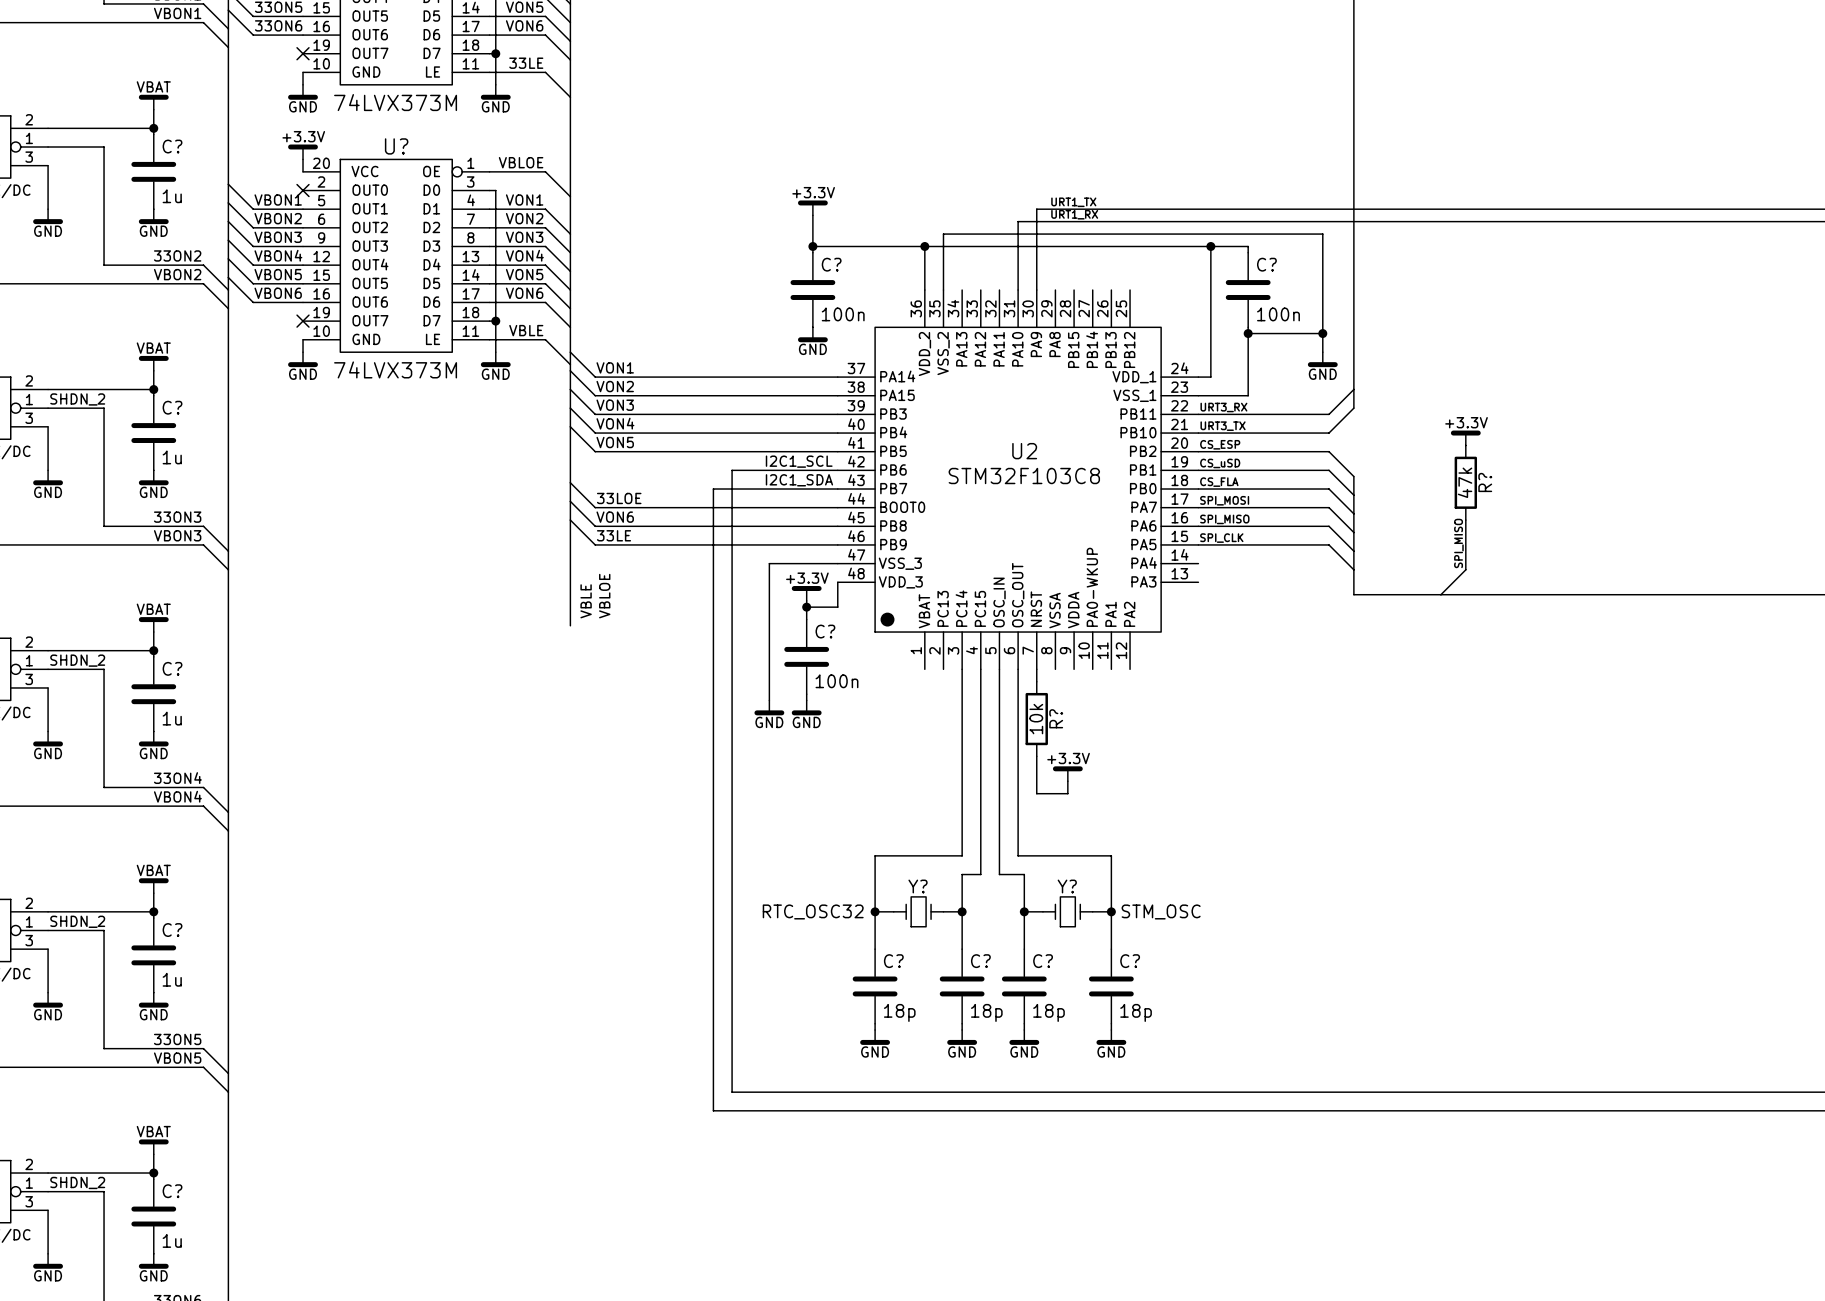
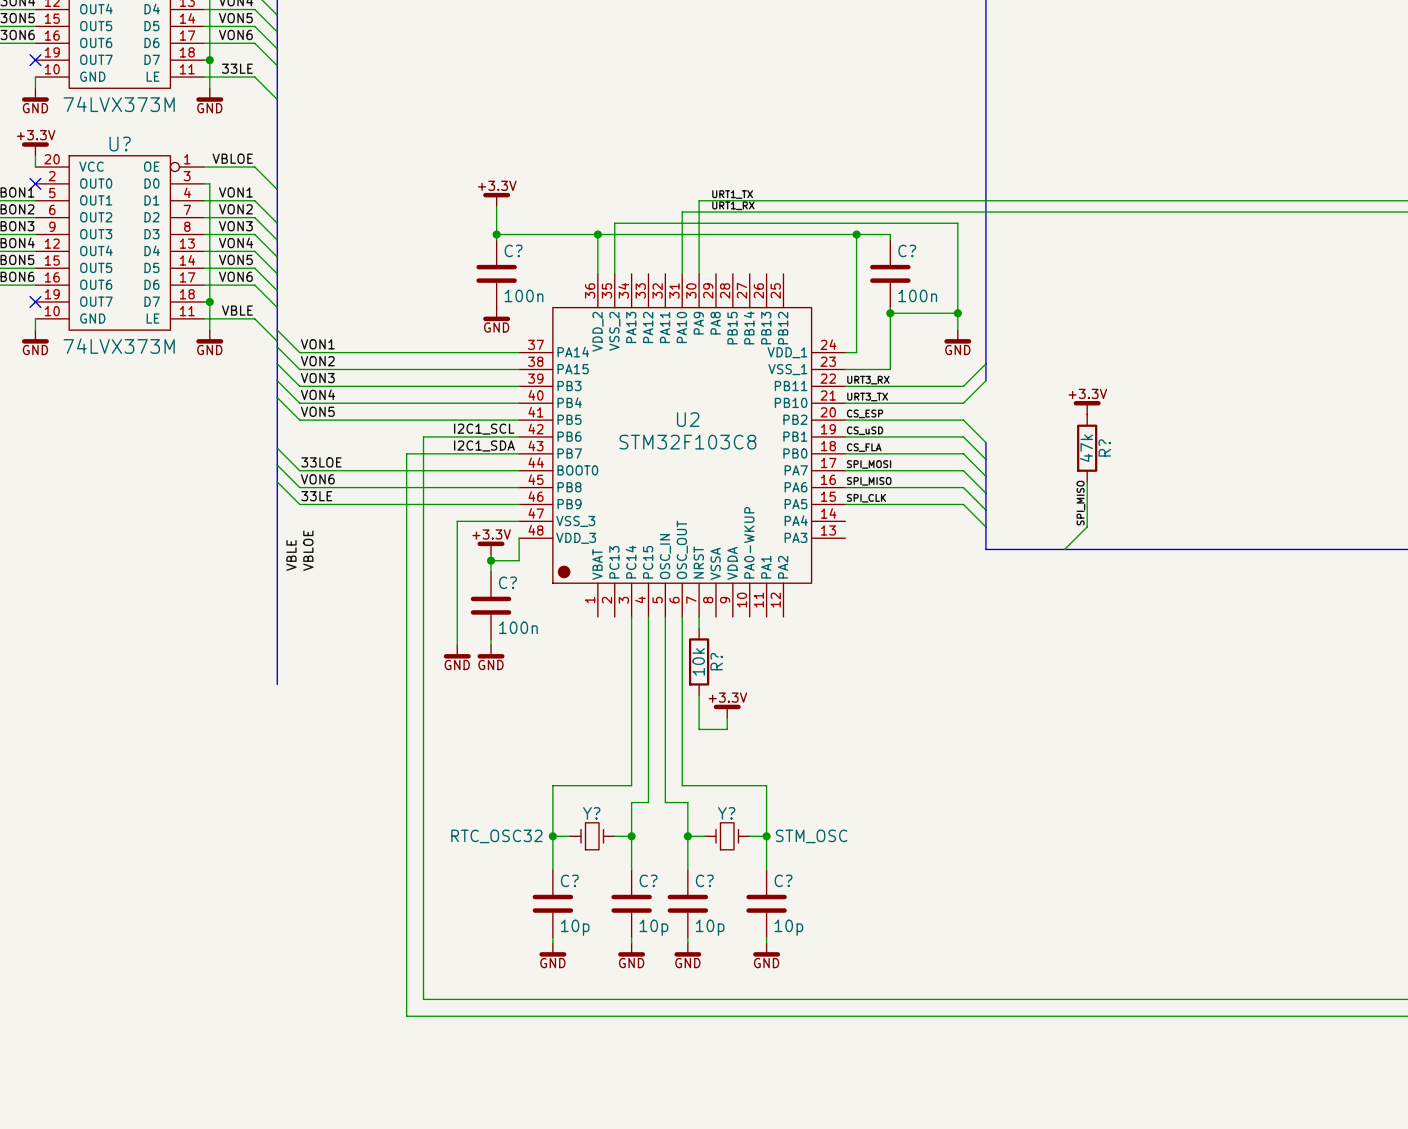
bus: none -> (277, 577) (277, 684)
C? value: 18p (899, 1012) -> 10p (575, 927)
C? value: 18p (986, 1012) -> 10p (653, 927)
C? value: 18p (1048, 1012) -> 10p (710, 927)
C? value: 18p (1136, 1012) -> 10p (788, 927)

